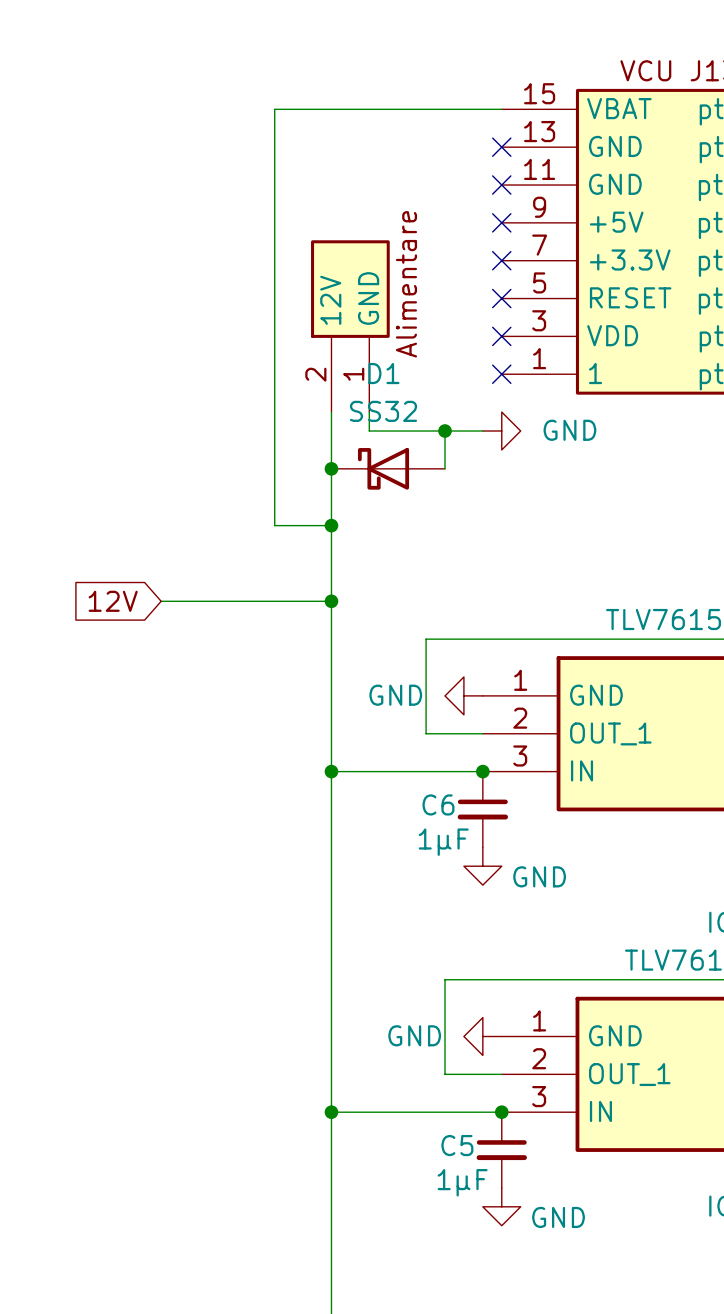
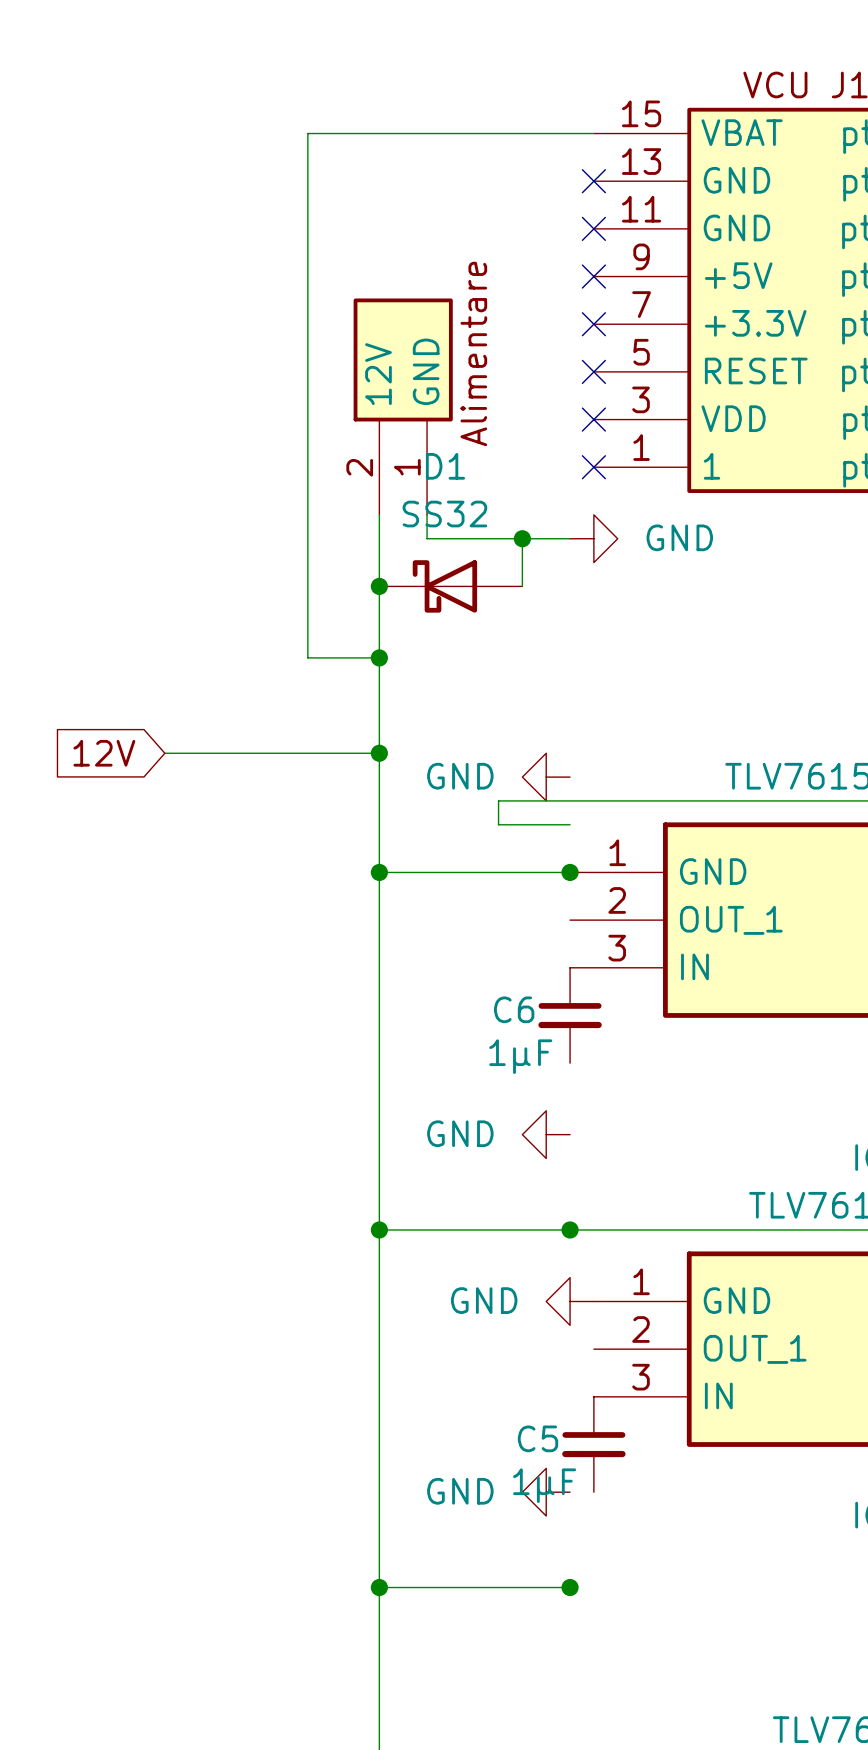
wire: (426, 658) (426, 733) (482, 733) -> (498, 824) (570, 824)
power symbol position: GND (463, 695) -> GND (546, 777)
wire: (331, 771) (482, 771) -> (379, 872) (570, 872)
junction position: (331, 771) -> (379, 872)
junction position: (482, 771) -> (570, 872)
power symbol rotation: 0° (482, 866) -> 90° clockwise (546, 1134)
power symbol position: GND (482, 866) -> GND (546, 1134)
power symbol text position: GND (539, 876) -> GND (460, 1133)
junction: none -> (379, 1229)
wire: (445, 979) (445, 1074) (501, 1074) -> (522, 1229) (379, 1229)
junction: none -> (570, 1229)
wire: (331, 1112) (501, 1112) -> none
junction: (331, 1112) -> none
junction: (501, 1112) -> none
power symbol rotation: 0° (501, 1206) -> 90° clockwise (546, 1492)
power symbol position: GND (501, 1206) -> GND (546, 1492)
power symbol text position: GND (558, 1217) -> GND (460, 1491)
wire: none -> (379, 1587) (570, 1587)
junction: none -> (379, 1587)
junction: none -> (570, 1587)

